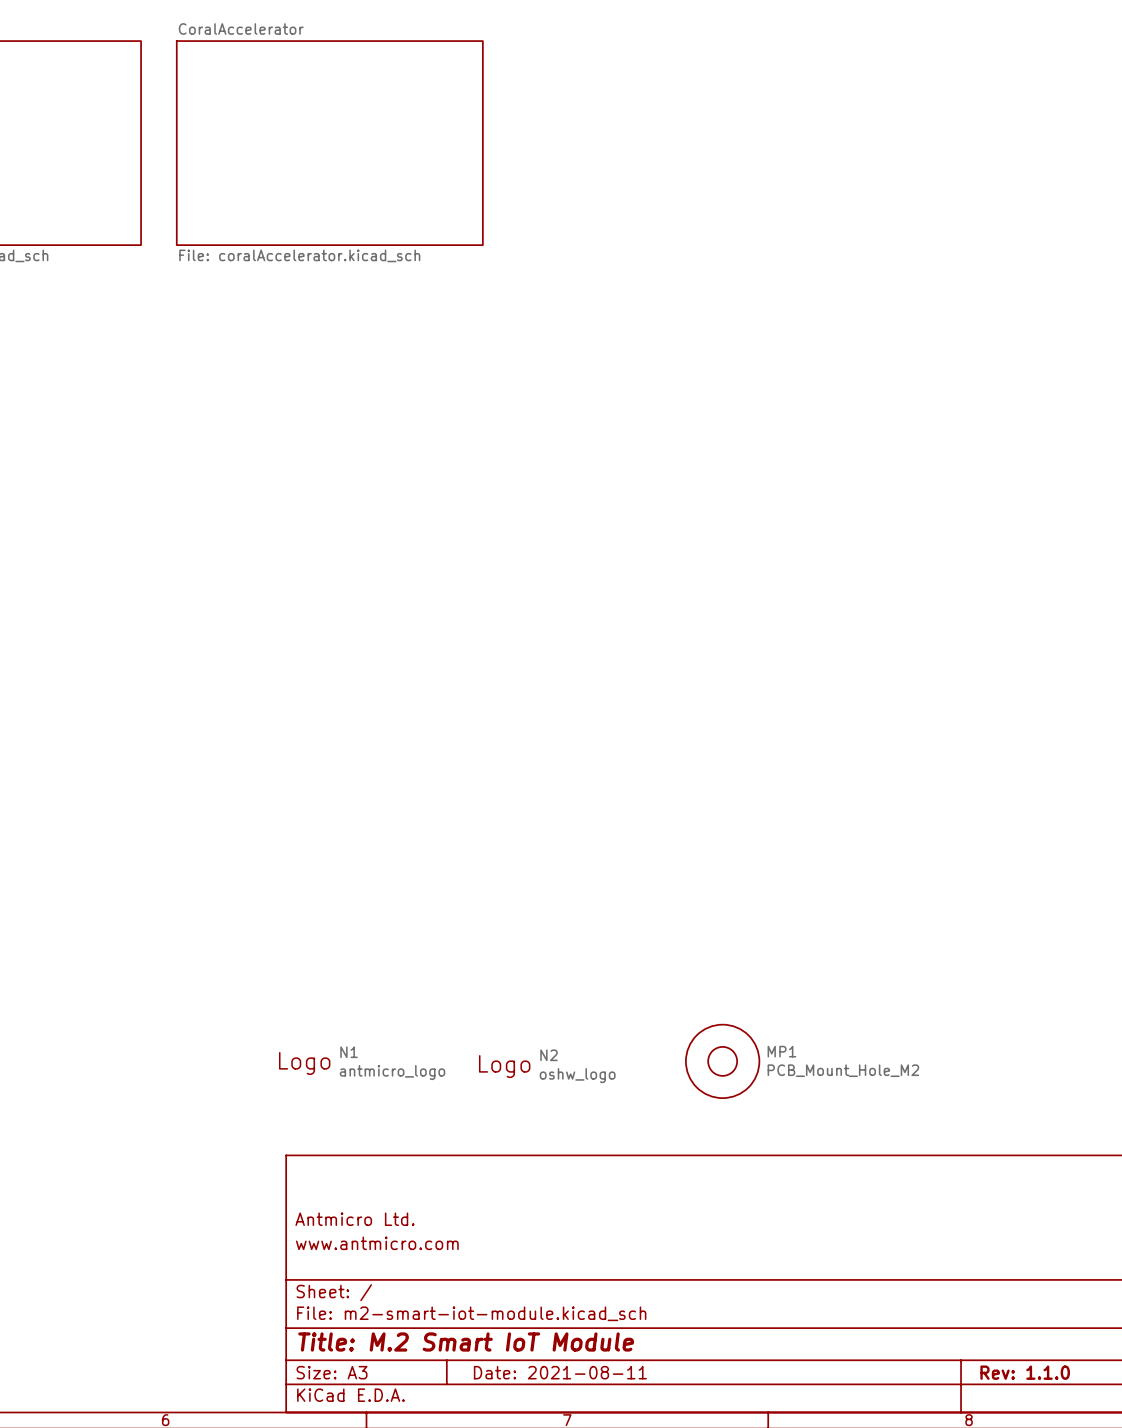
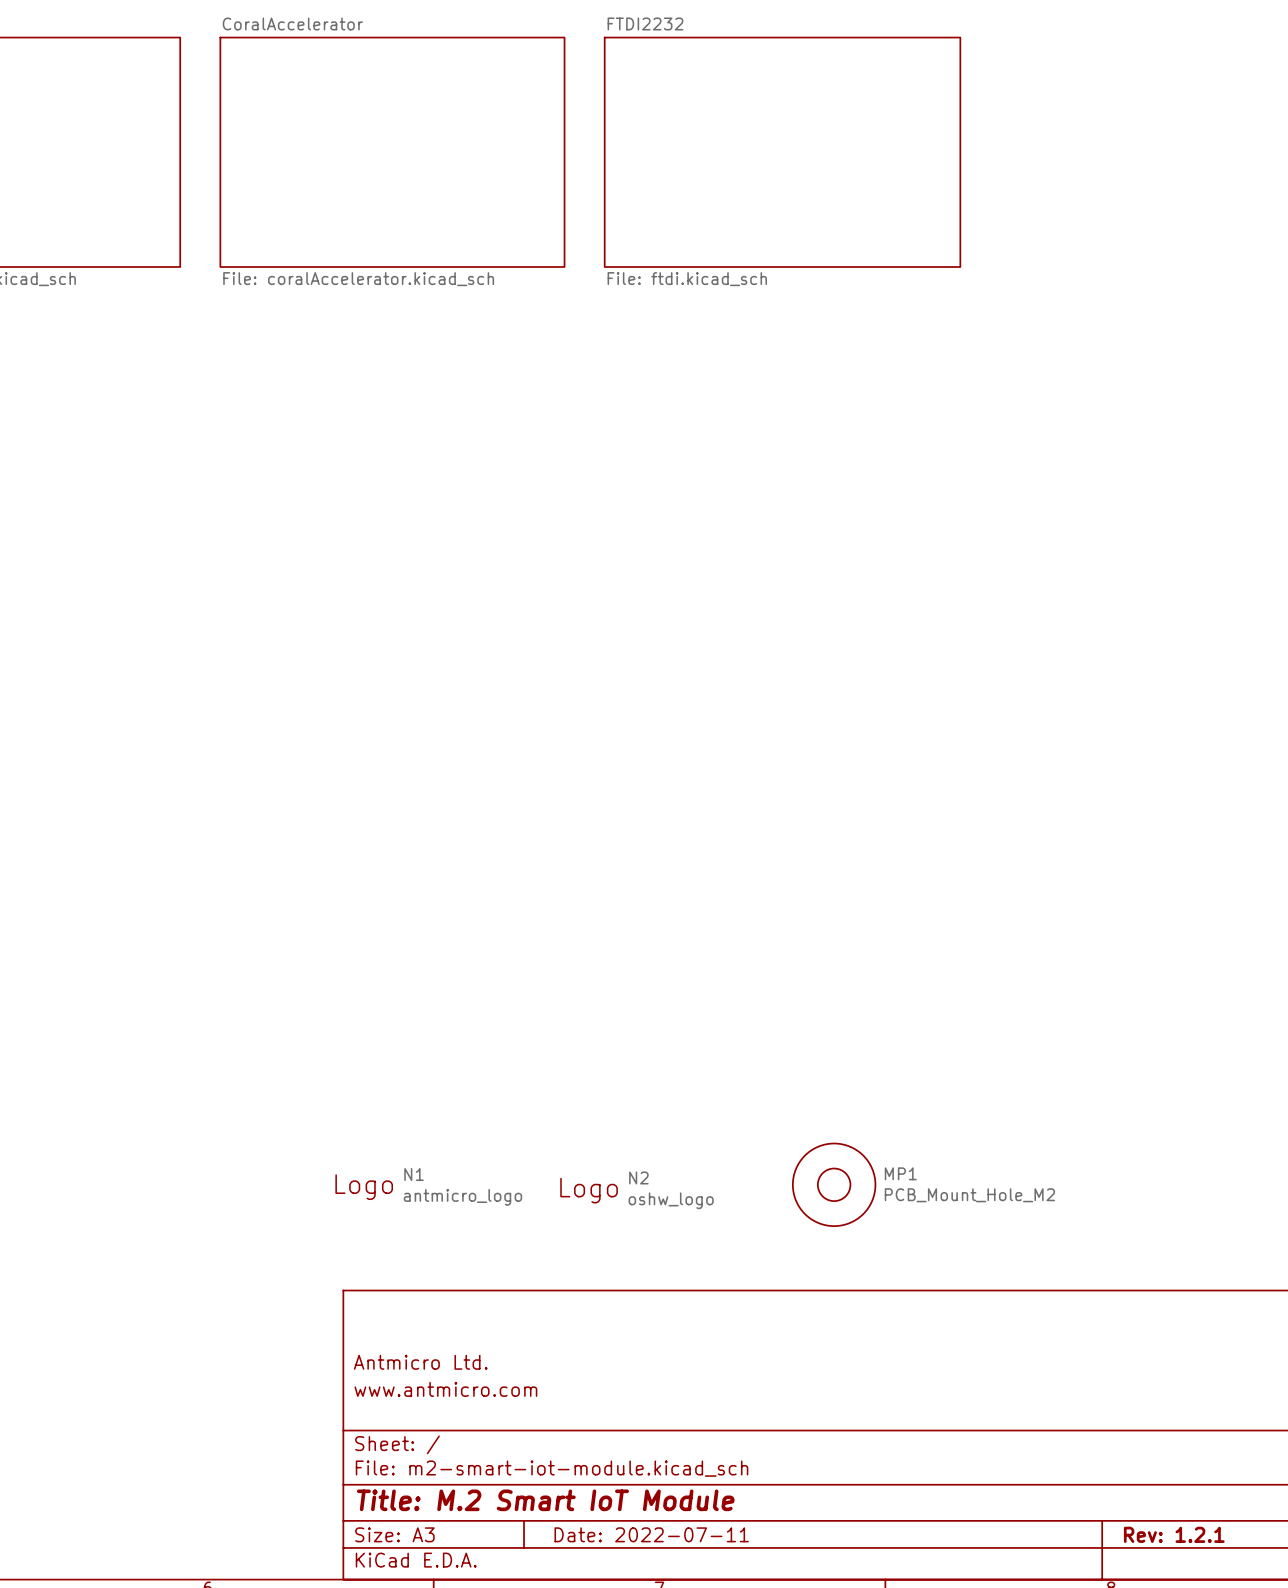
sheet FTDI2232: none -> File: ftdi.kicad_sch (782, 152)
title block: Date: 2021-08-11 (560, 1372) -> Date: 2022-07-11 (651, 1534)
title block: Rev: 1.1.0 (1025, 1372) -> Rev: 1.2.1 (1174, 1534)

